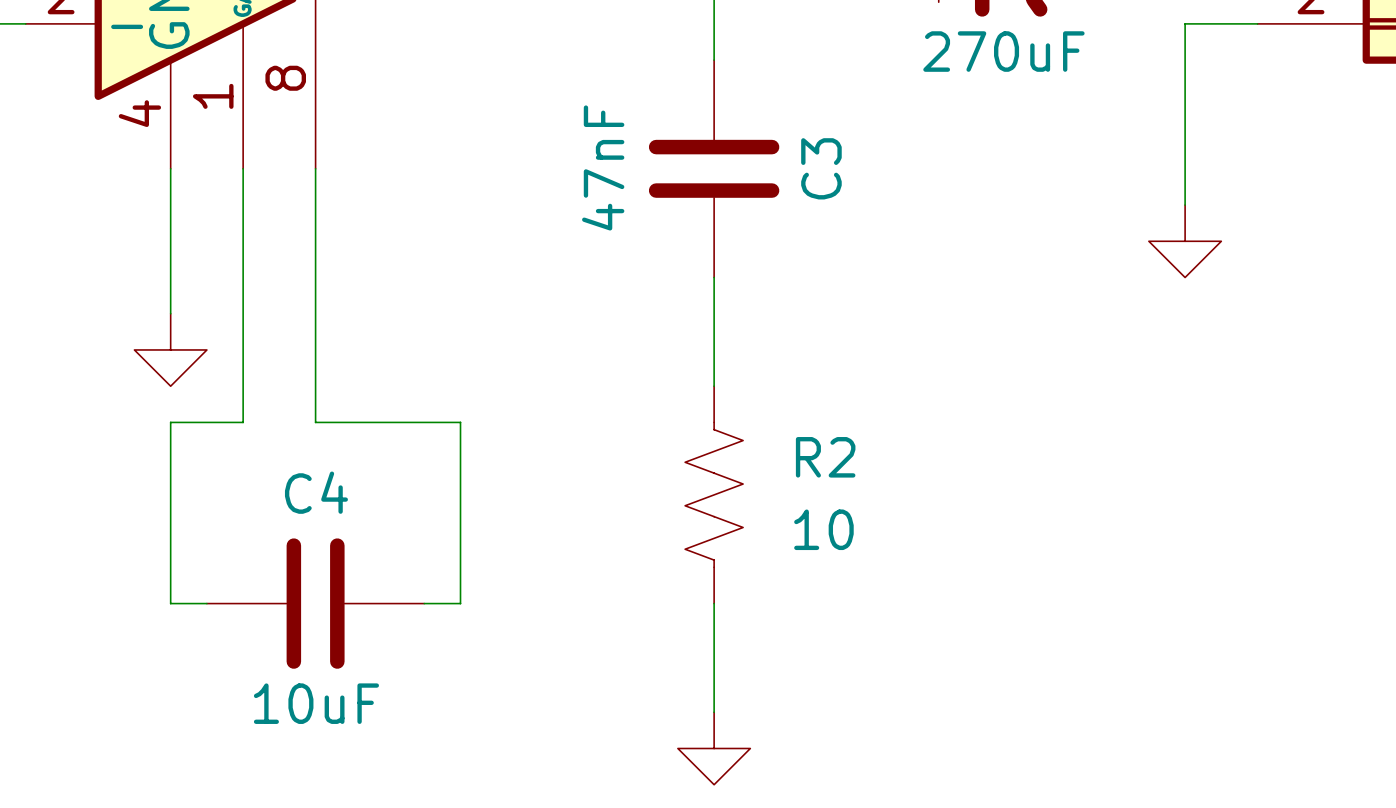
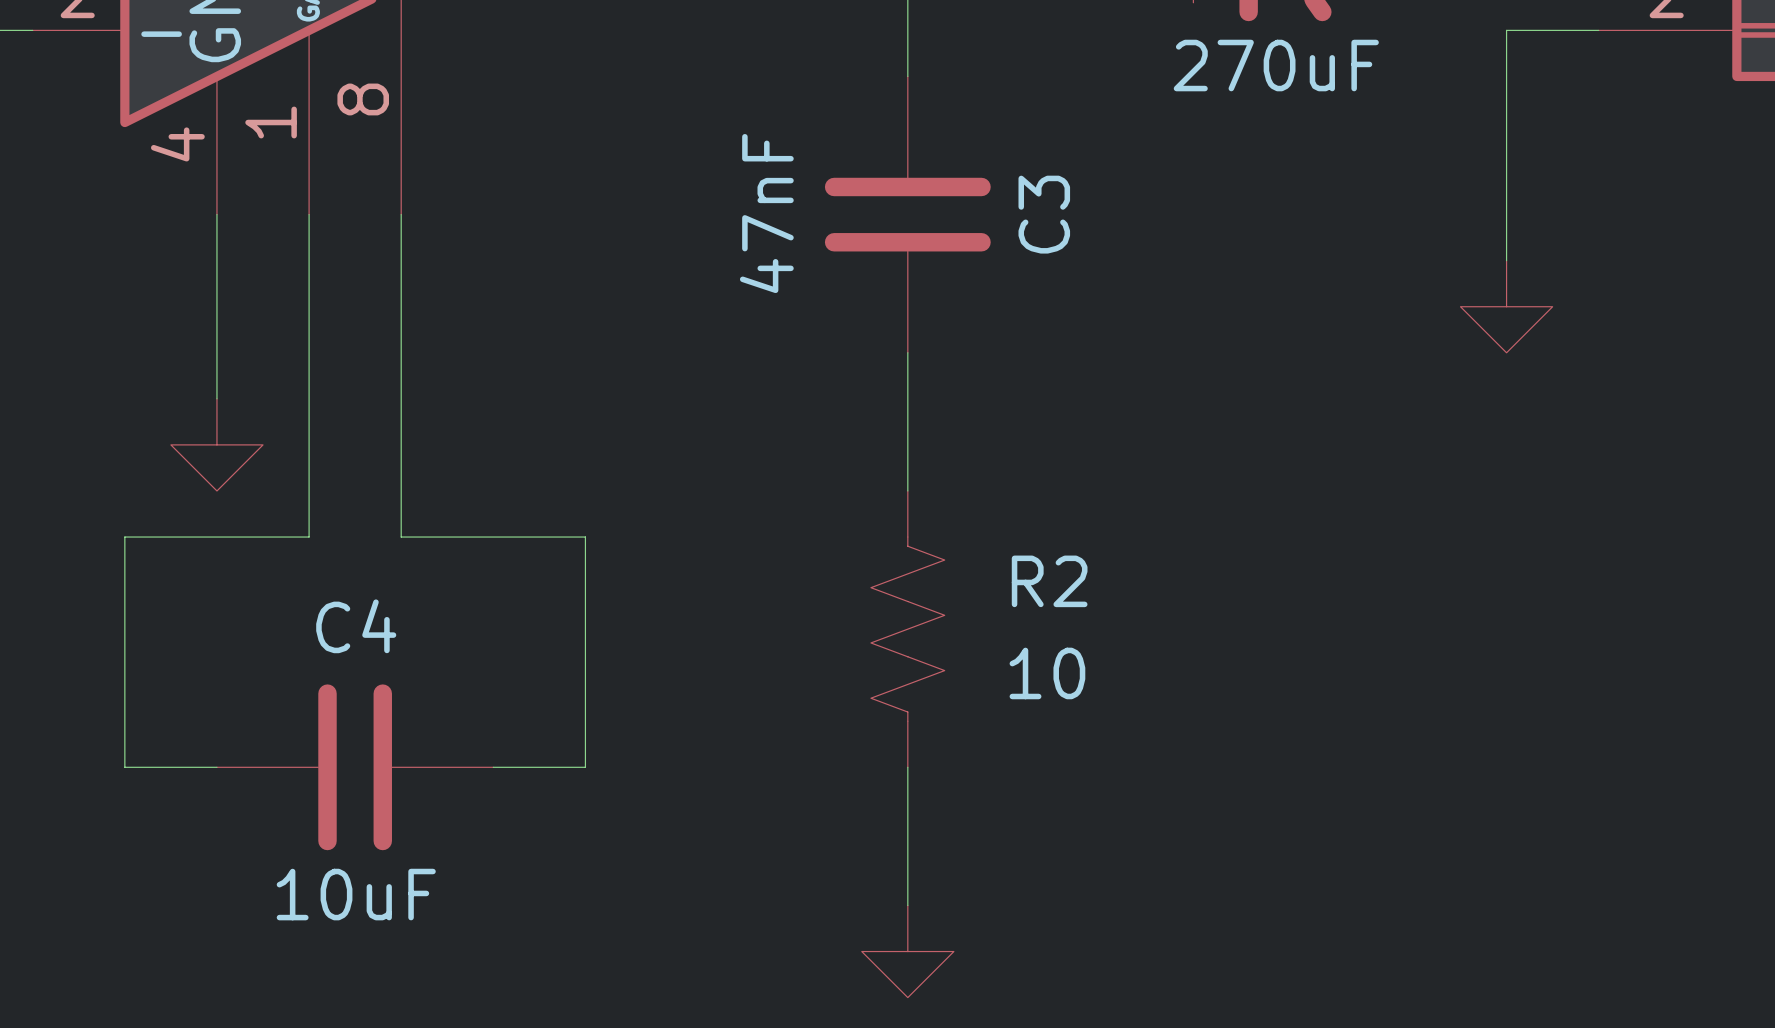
wire: (170, 422) (170, 603) (206, 603) -> (216, 537) (124, 537) (124, 767) (216, 767)
C4 position: (315, 603) -> (355, 767)

